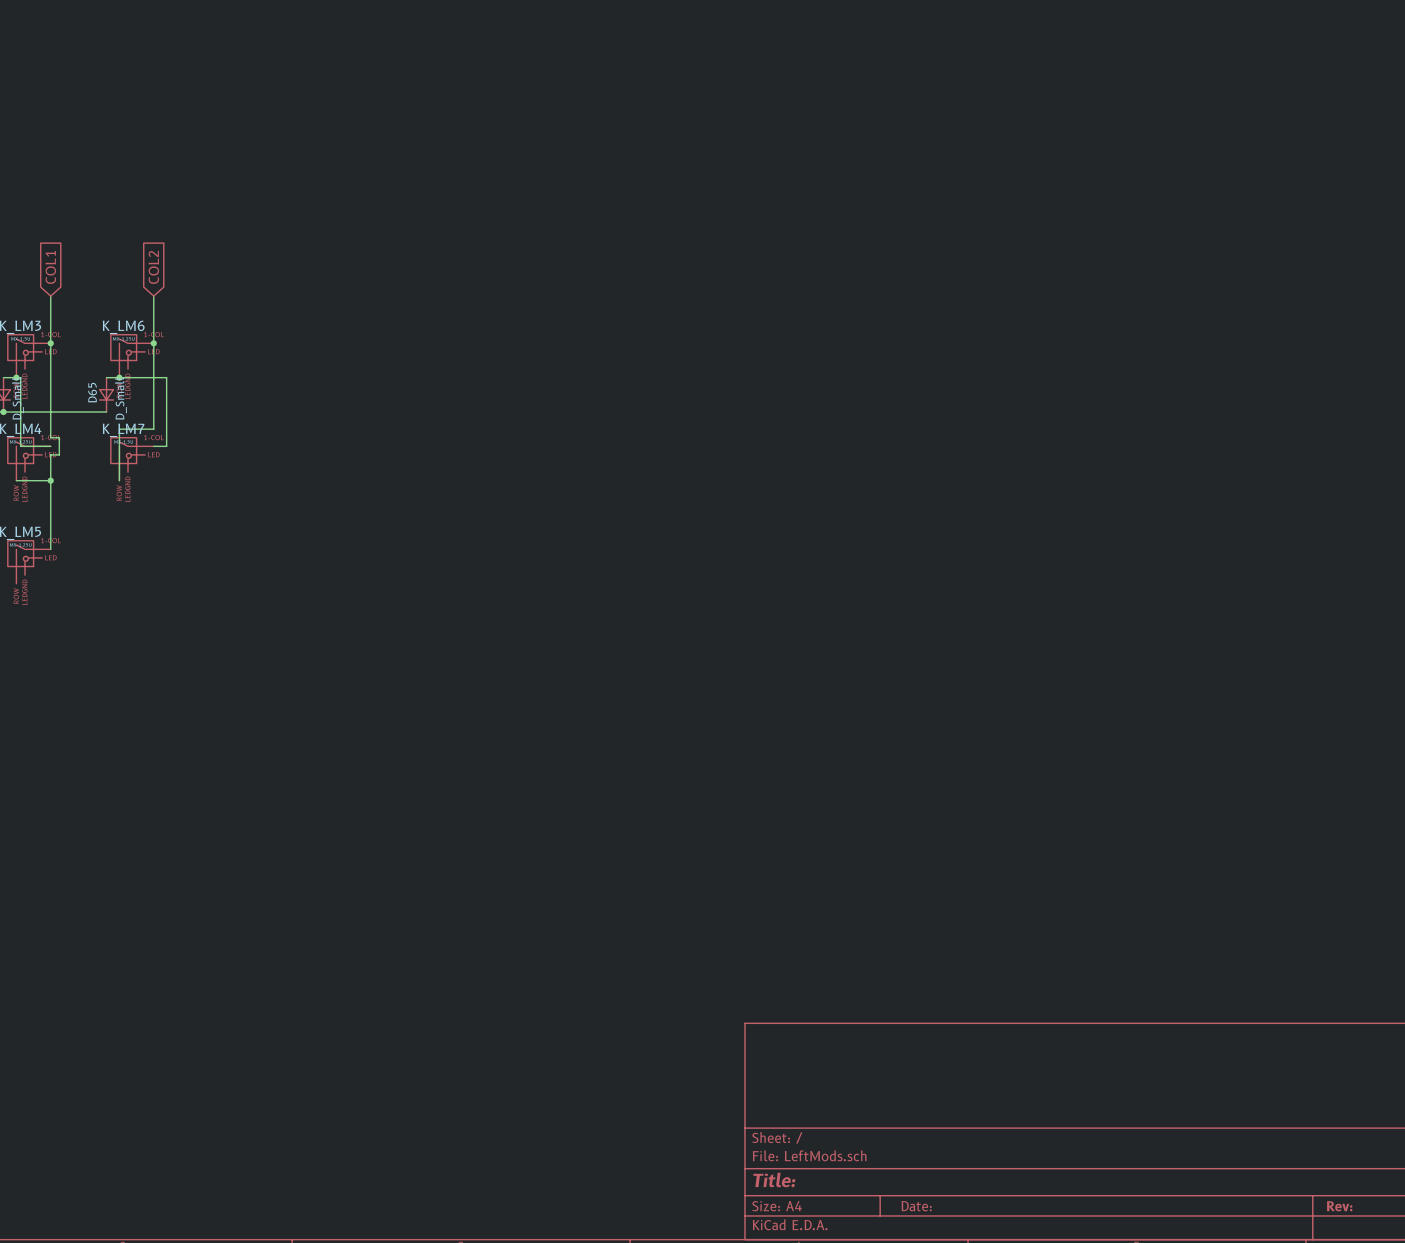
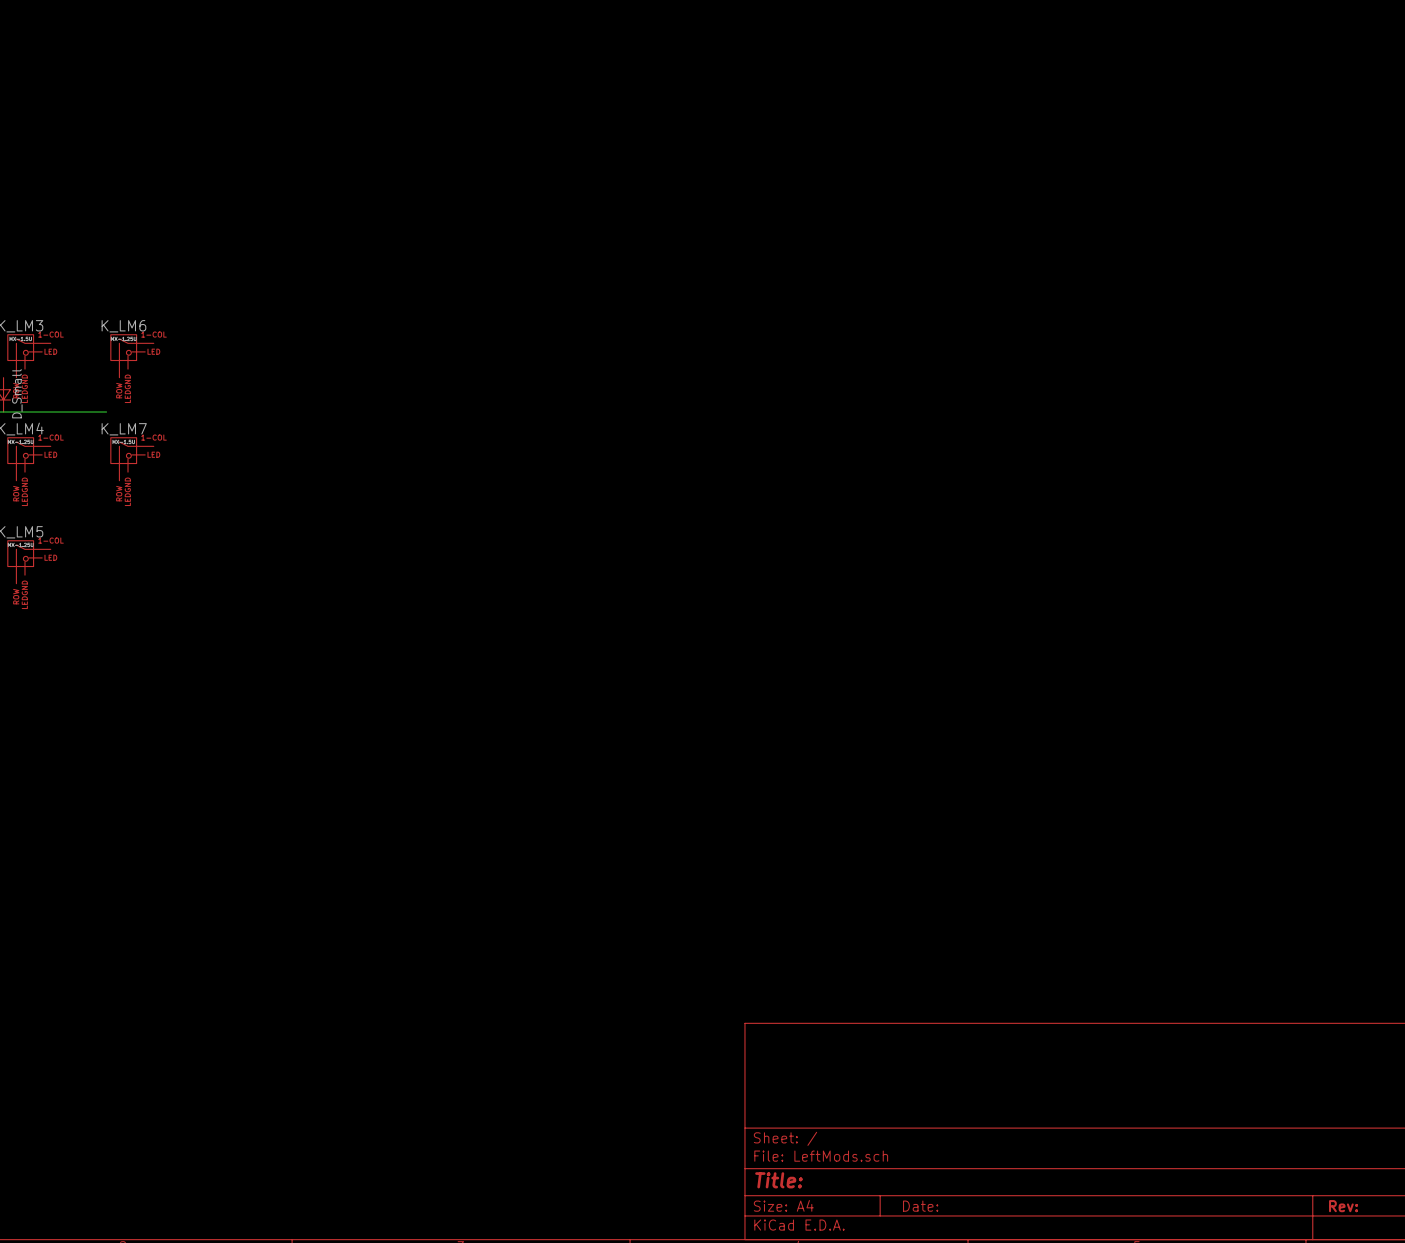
global label: COL1 (50, 267) -> none
global label: COL2 (153, 267) -> none
wire: (50, 296) (50, 437) (59, 437) (59, 454) (50, 454) (50, 549) -> none
wire: (153, 296) (153, 429) (119, 429) (119, 480) -> none
junction: (50, 343) -> none
junction: (153, 343) -> none
wire: (3, 377) (20, 377) (20, 446) (50, 446) -> none
junction: (16, 377) -> none
wire: (106, 377) (166, 377) (166, 446) (153, 446) -> none
junction: (119, 377) -> none
D65: D_Small (106, 394) -> none
junction: (3, 412) -> none
wire: (16, 480) (50, 480) -> none
junction: (50, 480) -> none

